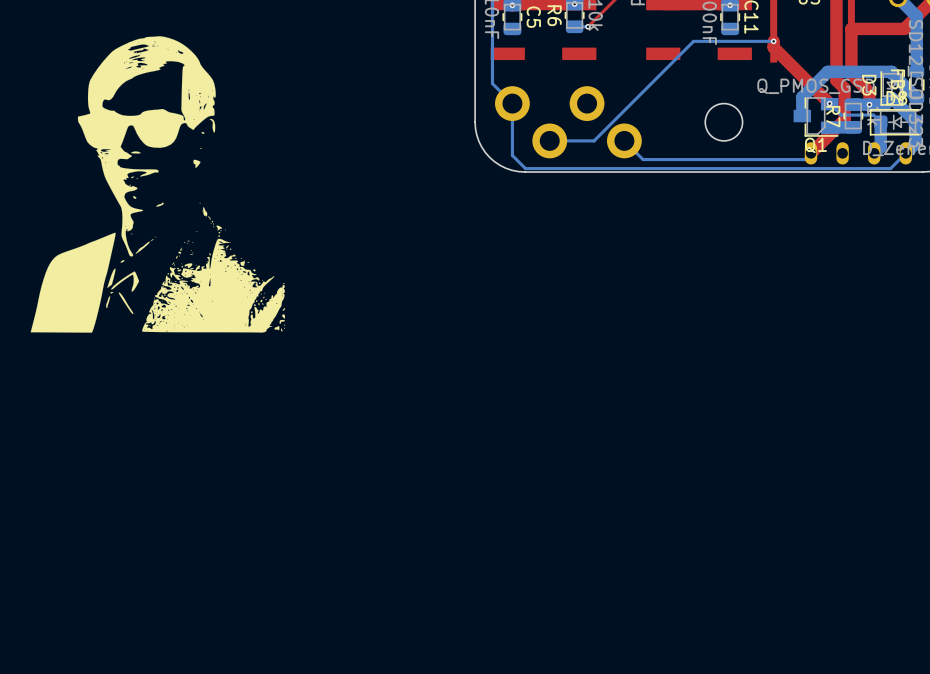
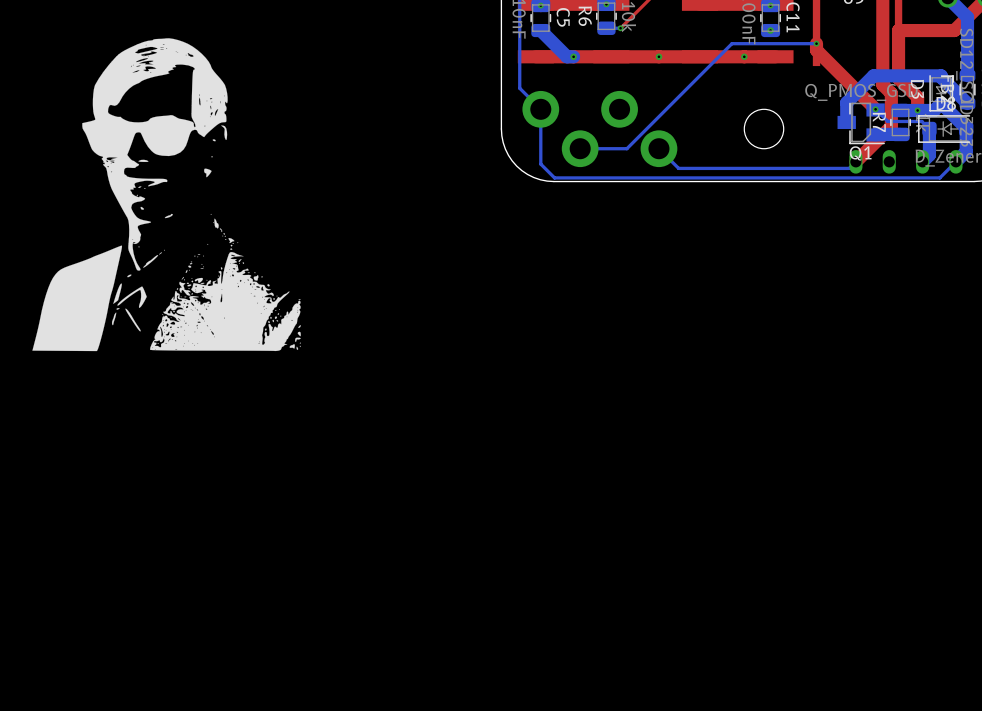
bottom track: none -> (540, 30) (567, 56) (573, 56)
via: none -> (770, 30)
via: none -> (573, 56)
via: none -> (658, 56)
via: none -> (744, 56)
top track: none -> (775, 56) (535, 56)

